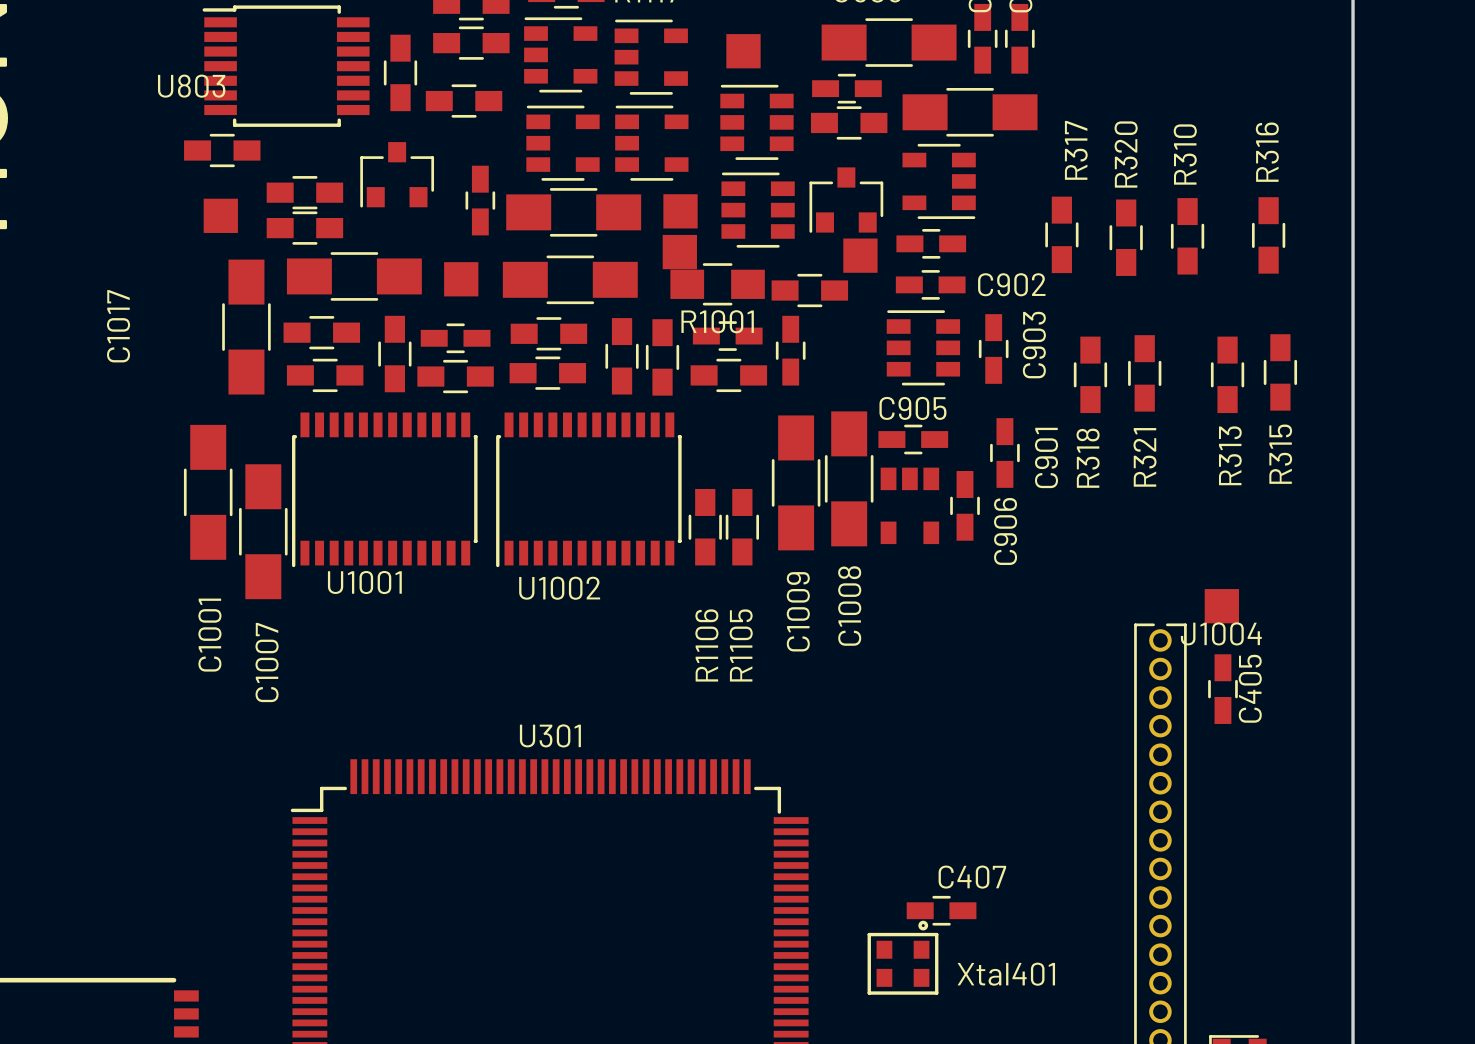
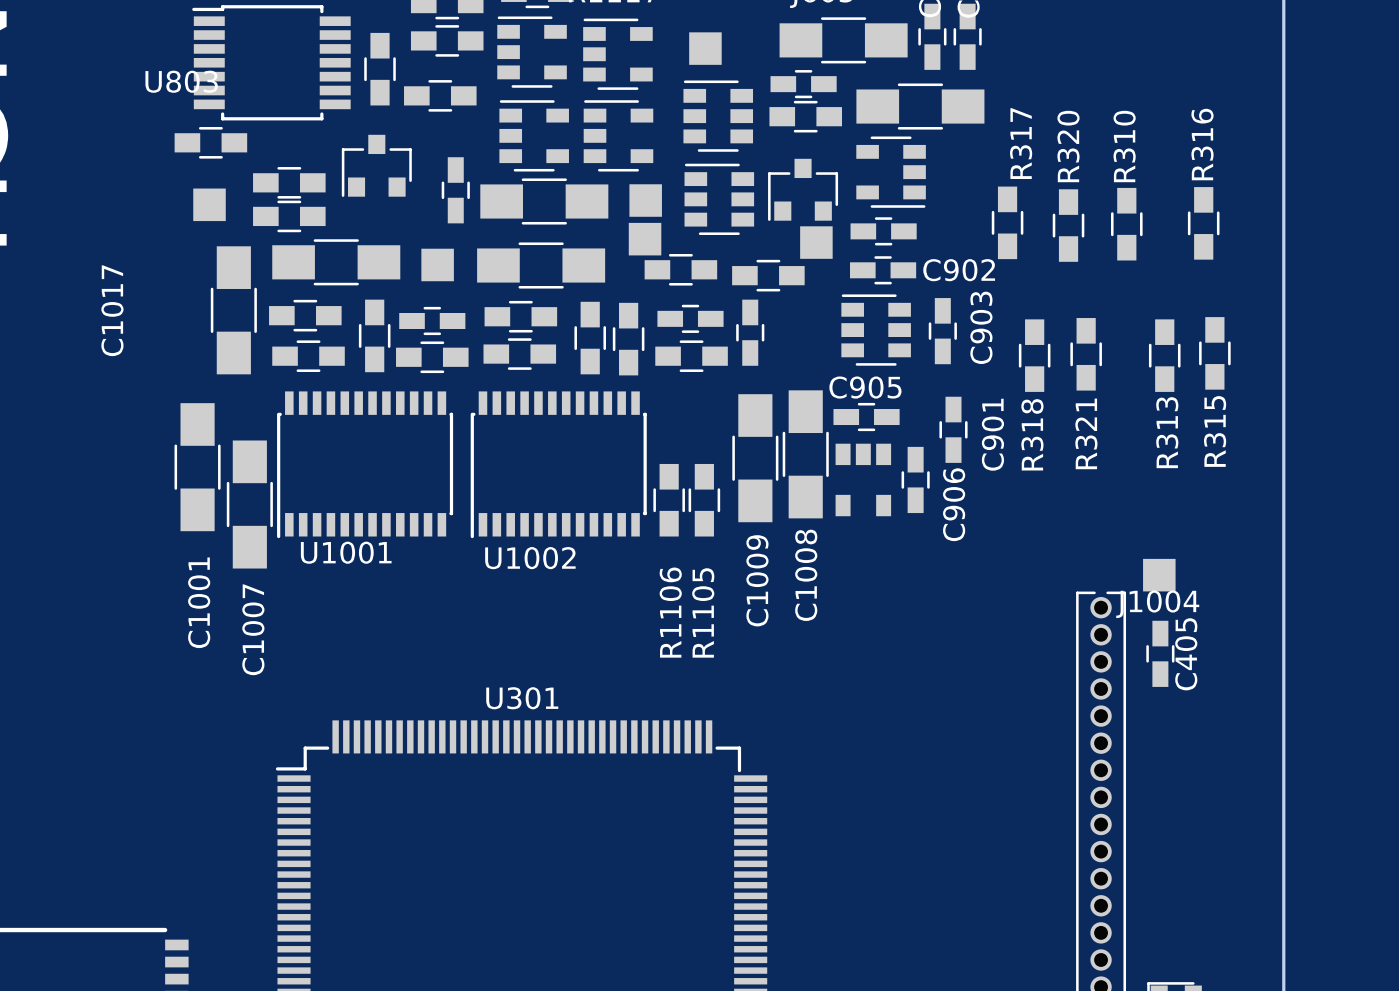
R1001: (717, 284) -> none
part: none -> (680, 269)
C407: (941, 910) -> none
Xtal401: (902, 957) -> none

